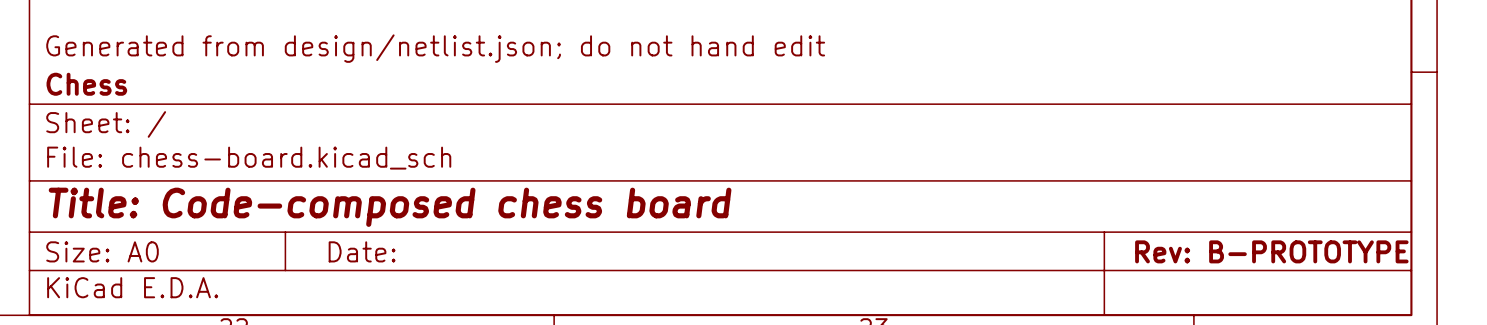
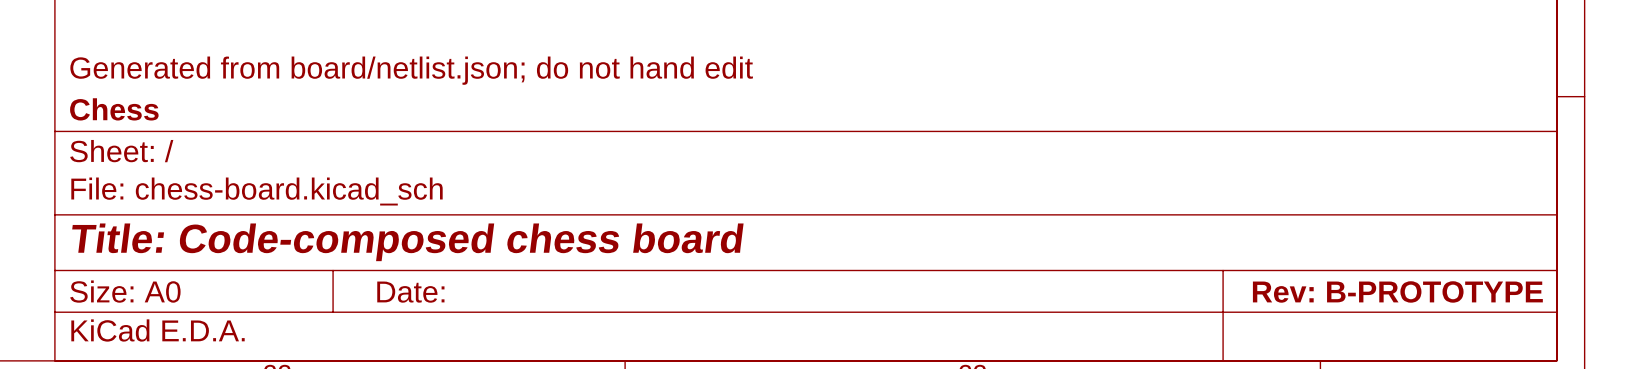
title block: Generated from design/netlist.json; do not hand edit (435, 48) -> Generated from board/netlist.json; do not hand edit (411, 70)

